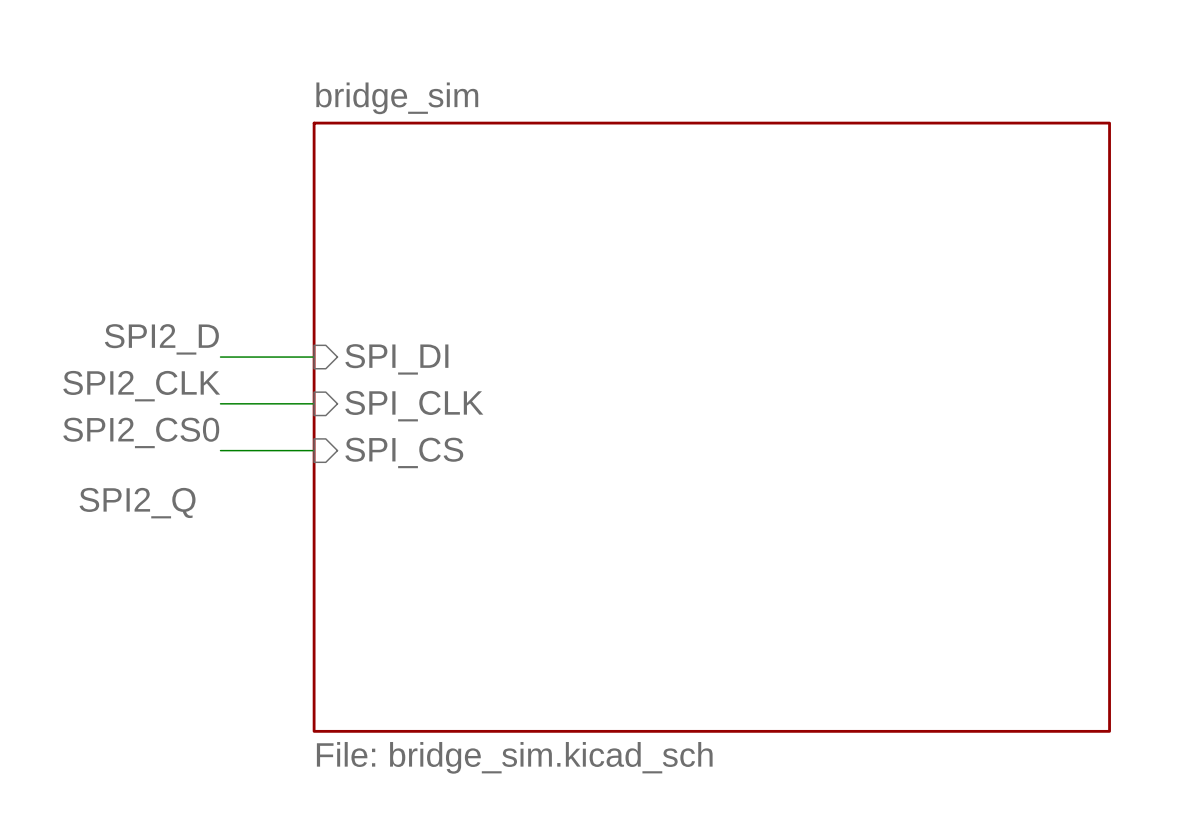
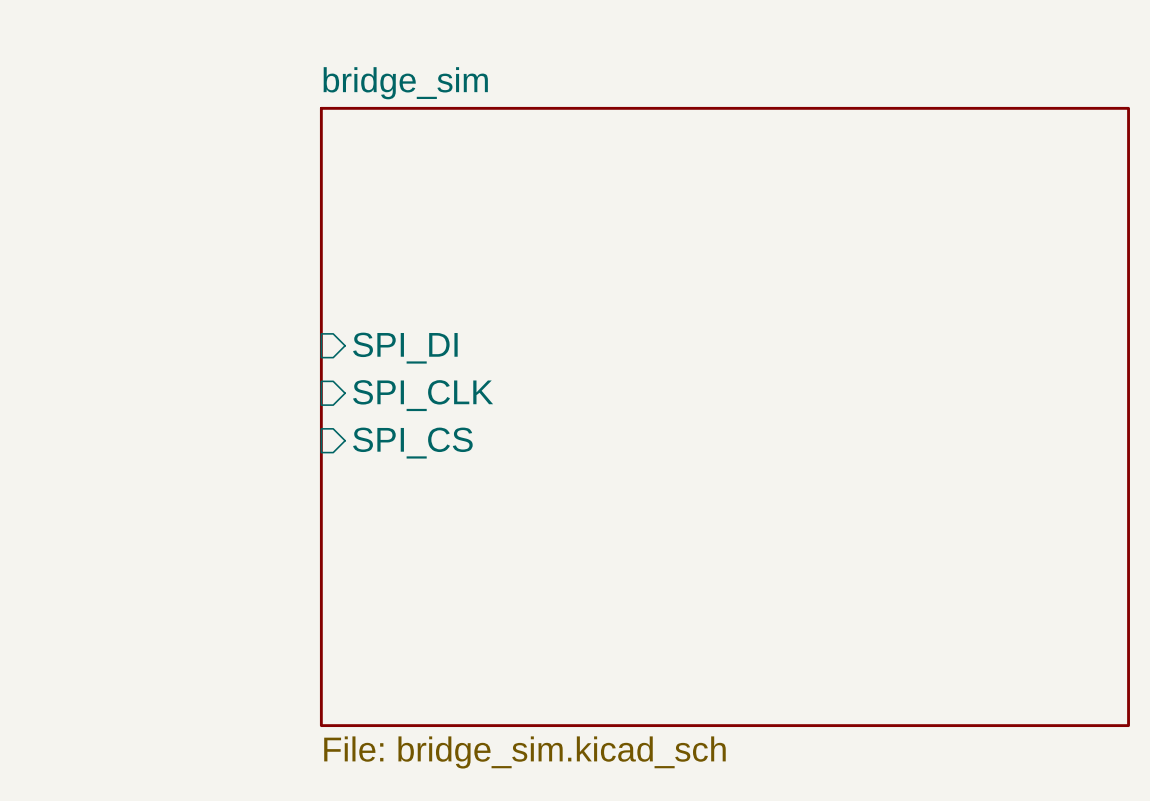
label: SPI2_D (161, 339) -> none
wire: (220, 357) (314, 357) -> none
label: SPI2_CLK (141, 386) -> none
wire: (220, 403) (314, 403) -> none
label: SPI2_CS0 (141, 432) -> none
wire: (220, 450) (314, 450) -> none
label: SPI2_Q (137, 503) -> none

